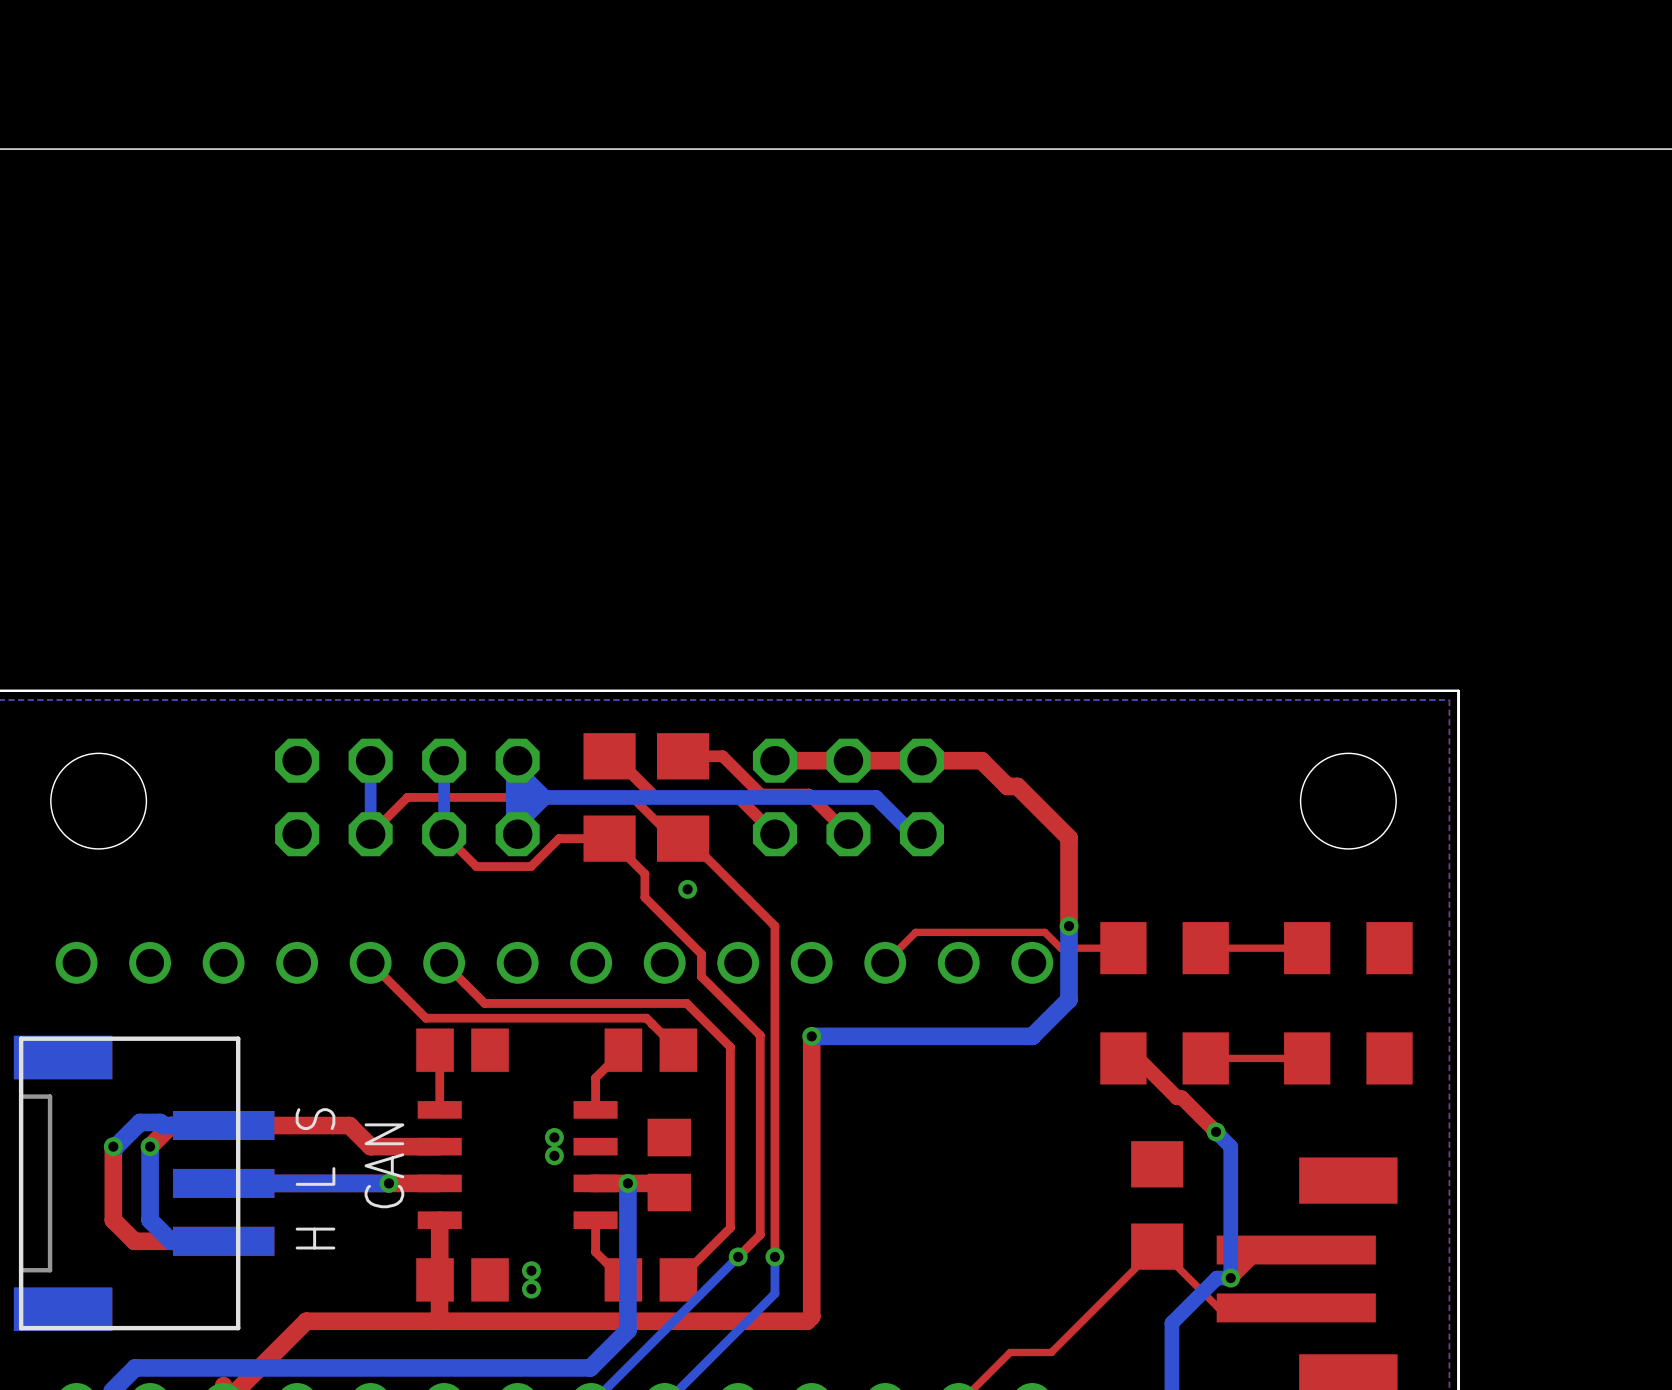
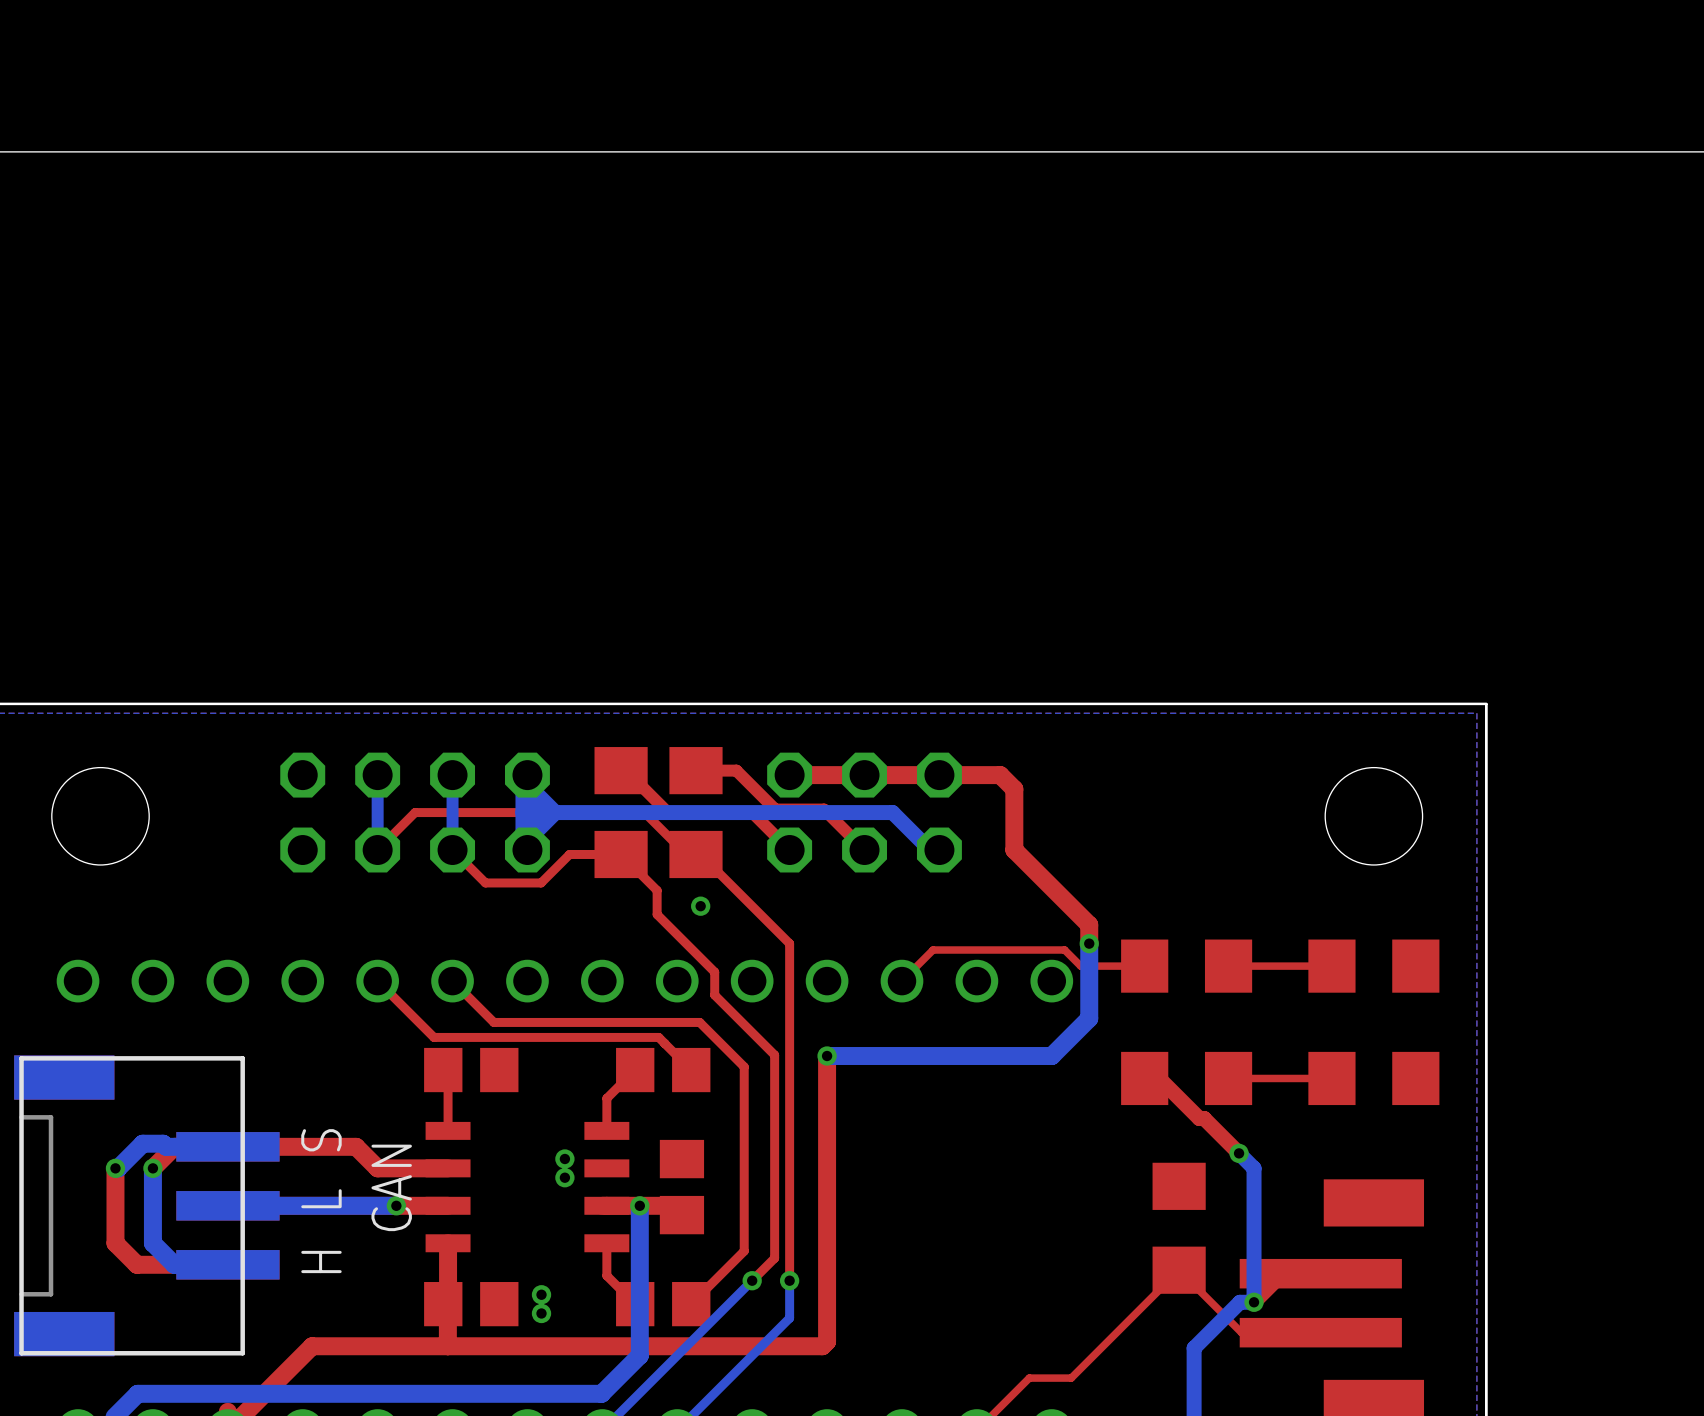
top track: (995, 774) (1007, 786) (1017, 786) (1069, 837) (1069, 907) -> (1014, 789) (1014, 850) (1089, 924)

